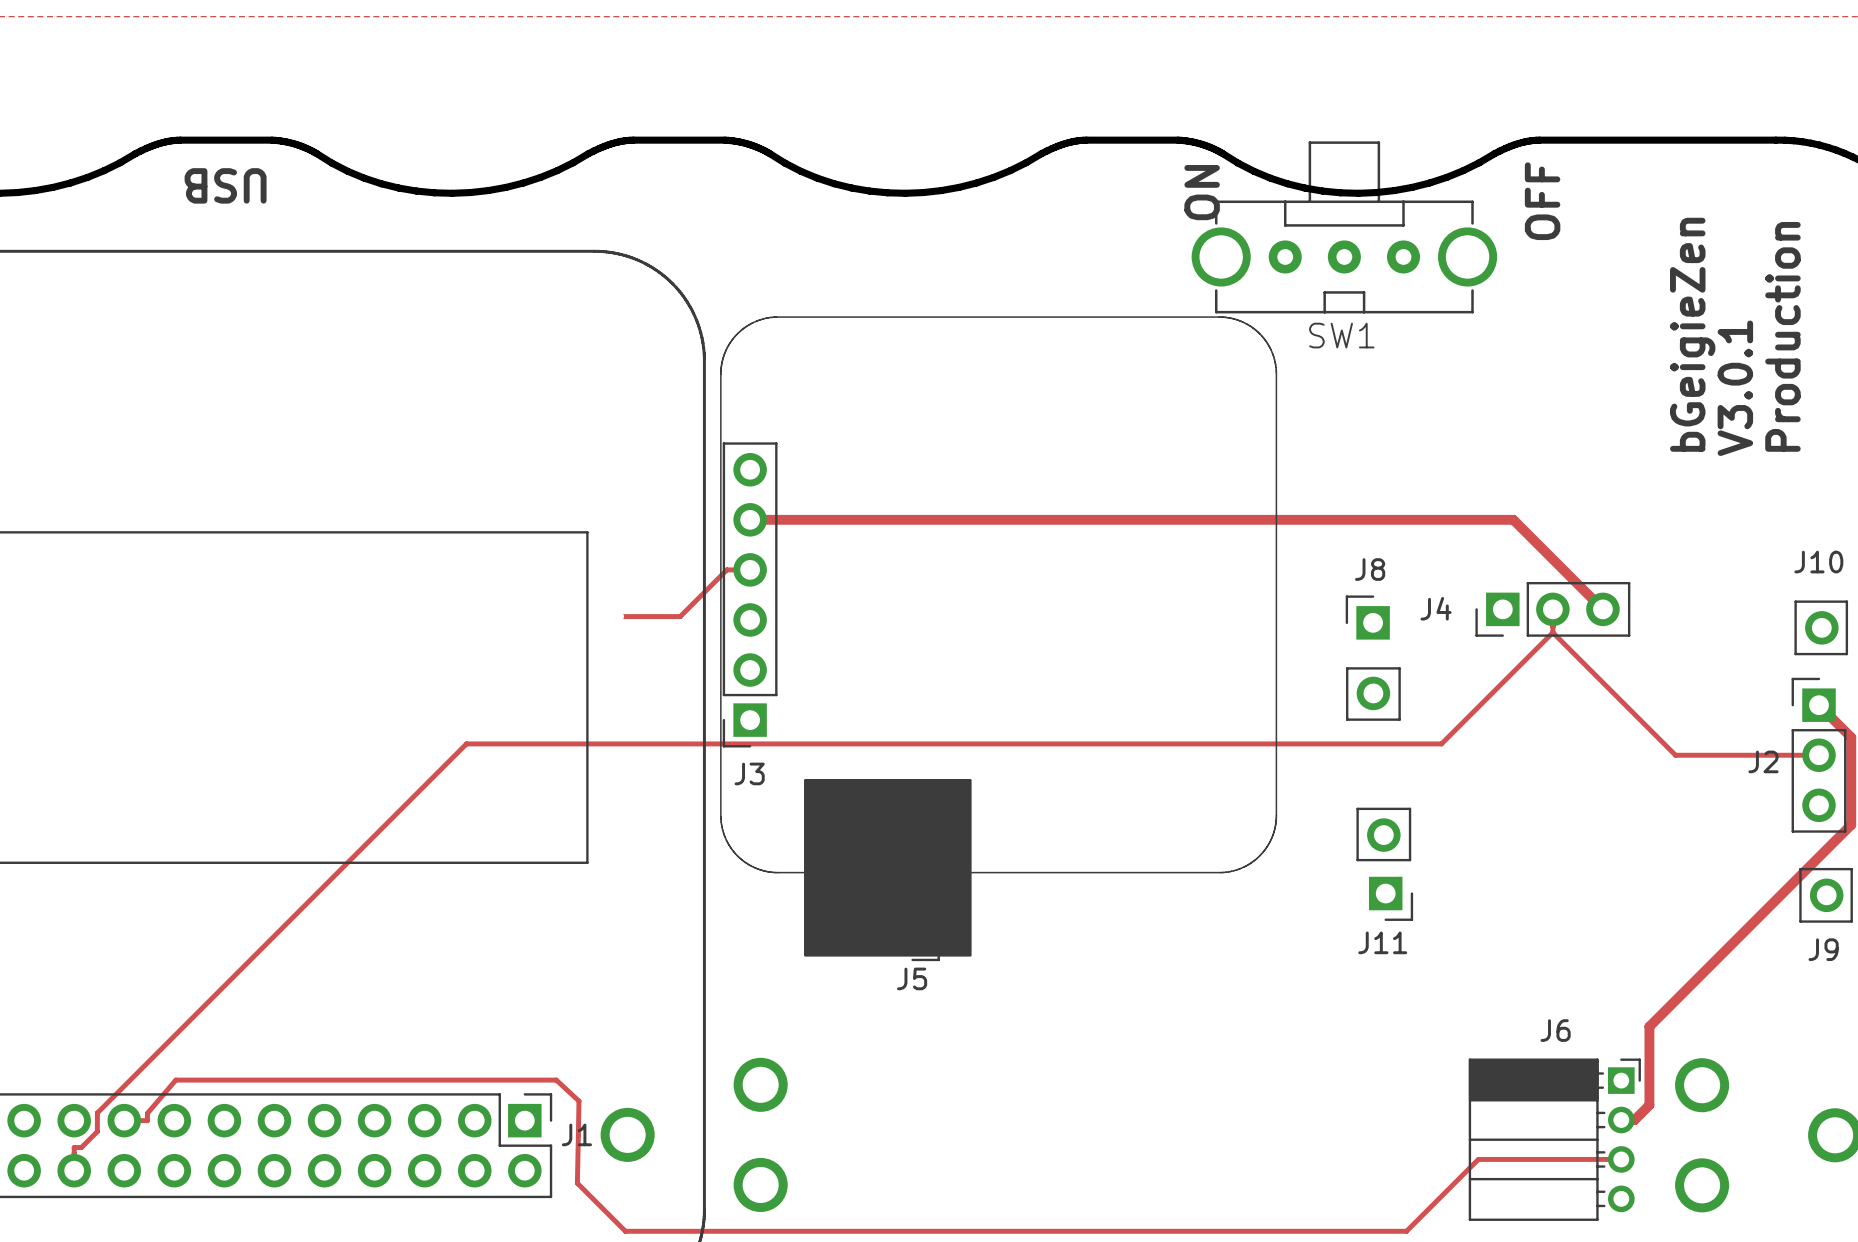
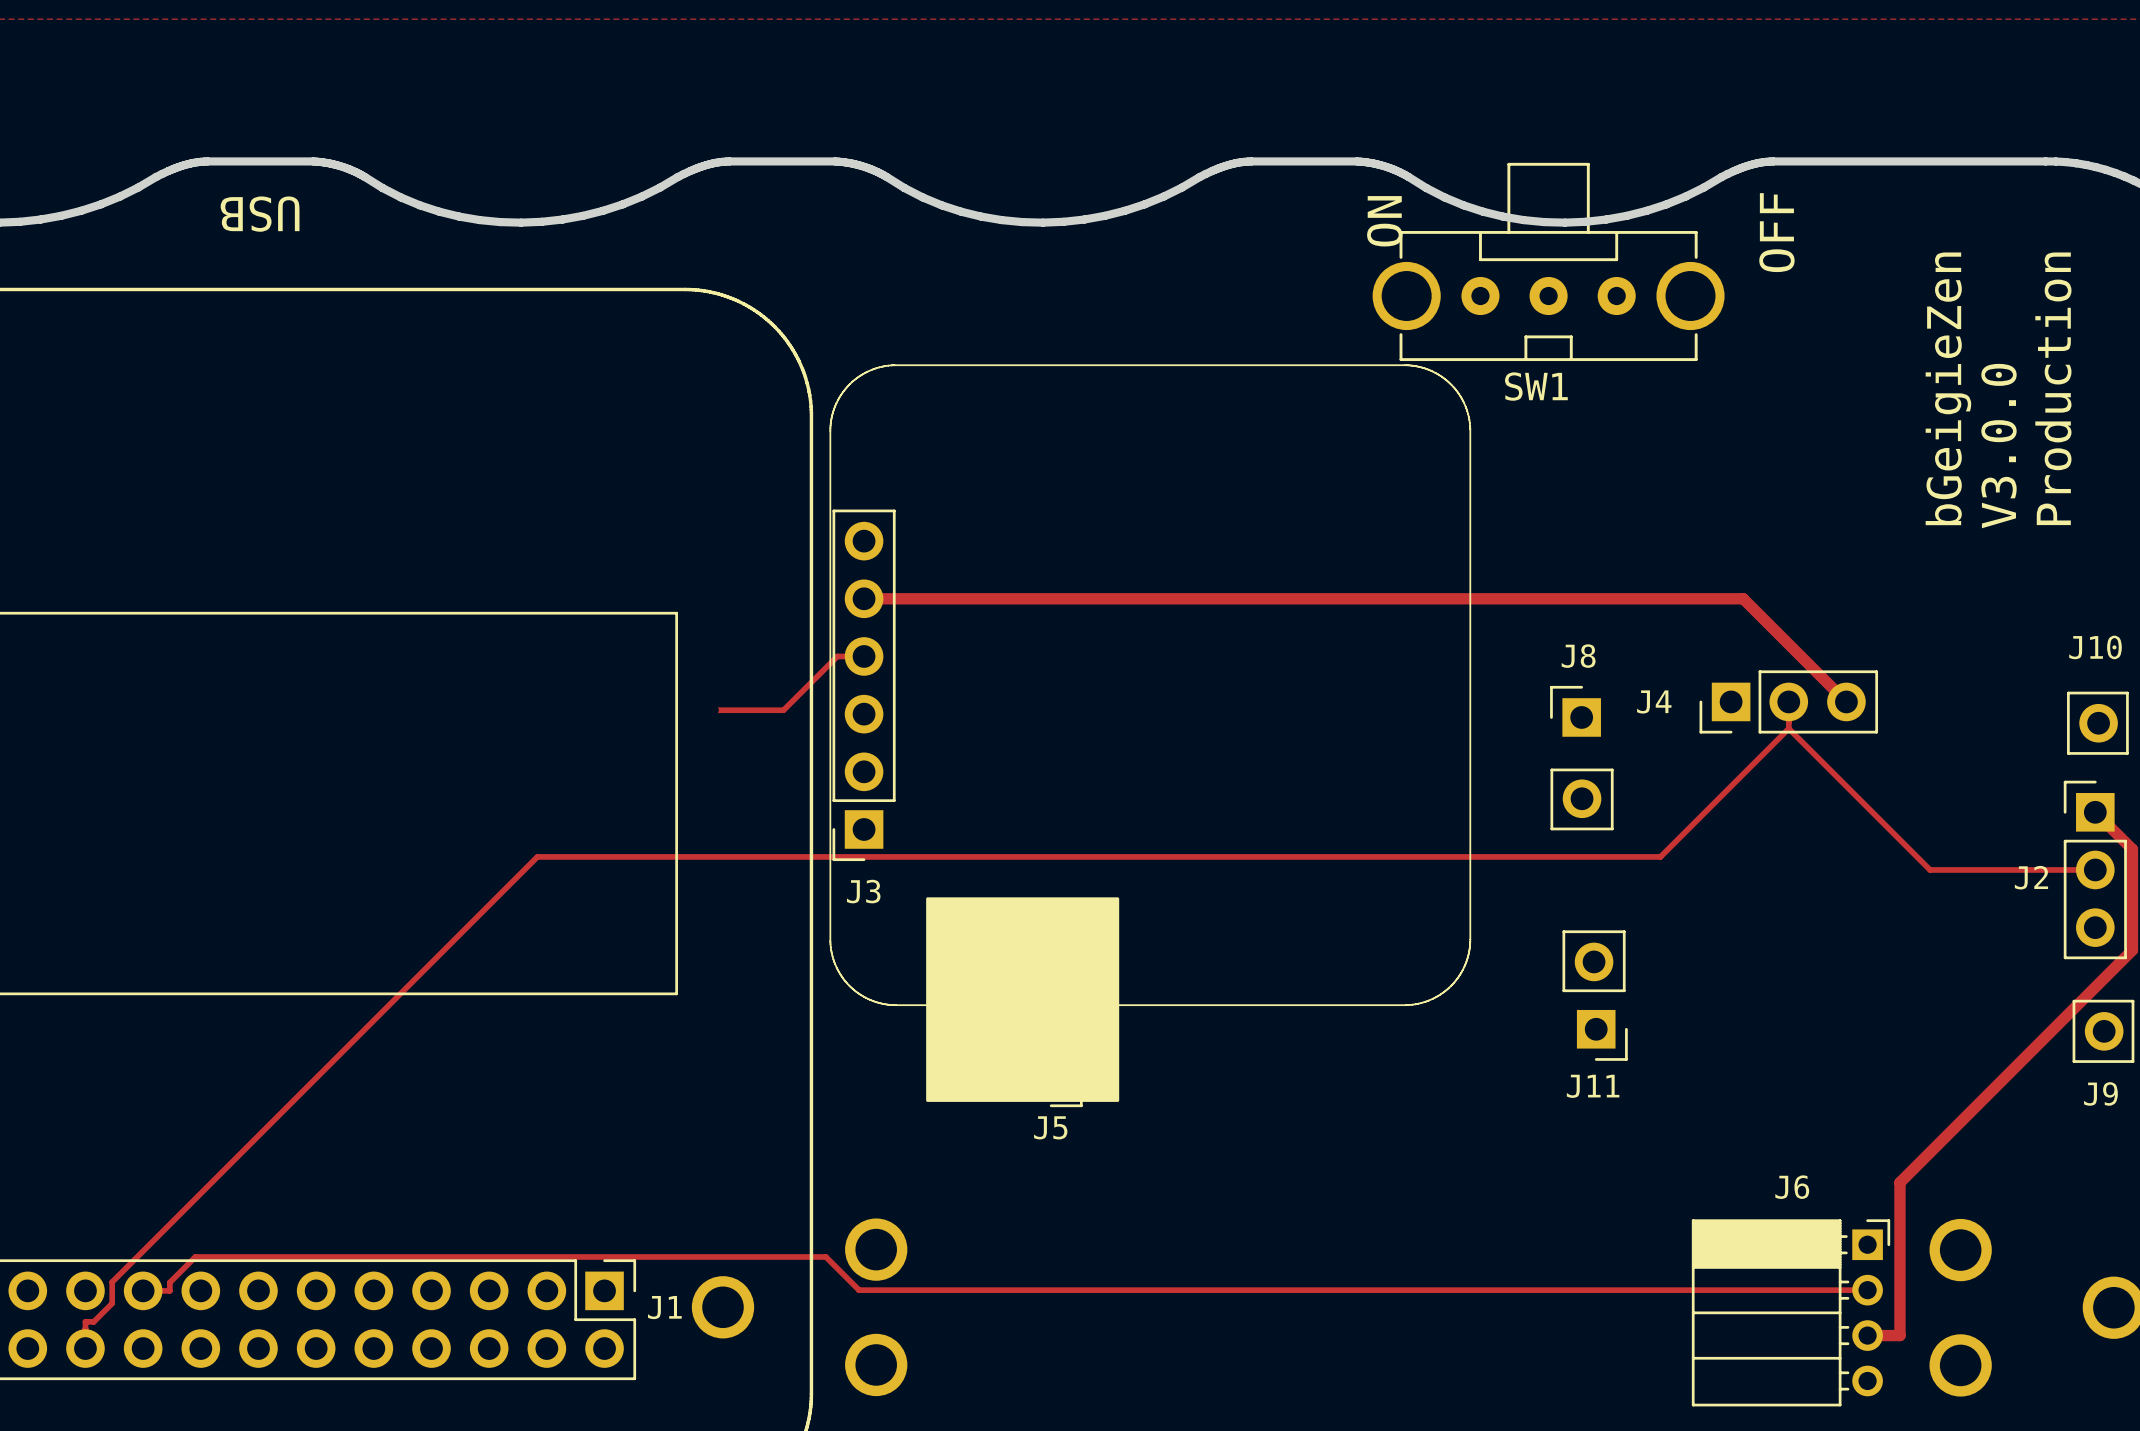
text: V3.0.1 (1735, 388) -> V3.0.0 (1998, 446)
track: (1649, 1105) (1634, 1120) (1621, 1120) -> (1899, 1273) (1899, 1335) (1867, 1335)
track: (147, 1113) (175, 1080) (556, 1080) (578, 1101) (577, 1183) (625, 1231) (1406, 1231) (1478, 1159) (1621, 1159) -> (169, 1282) (195, 1256) (825, 1256) (859, 1290) (1867, 1290)

